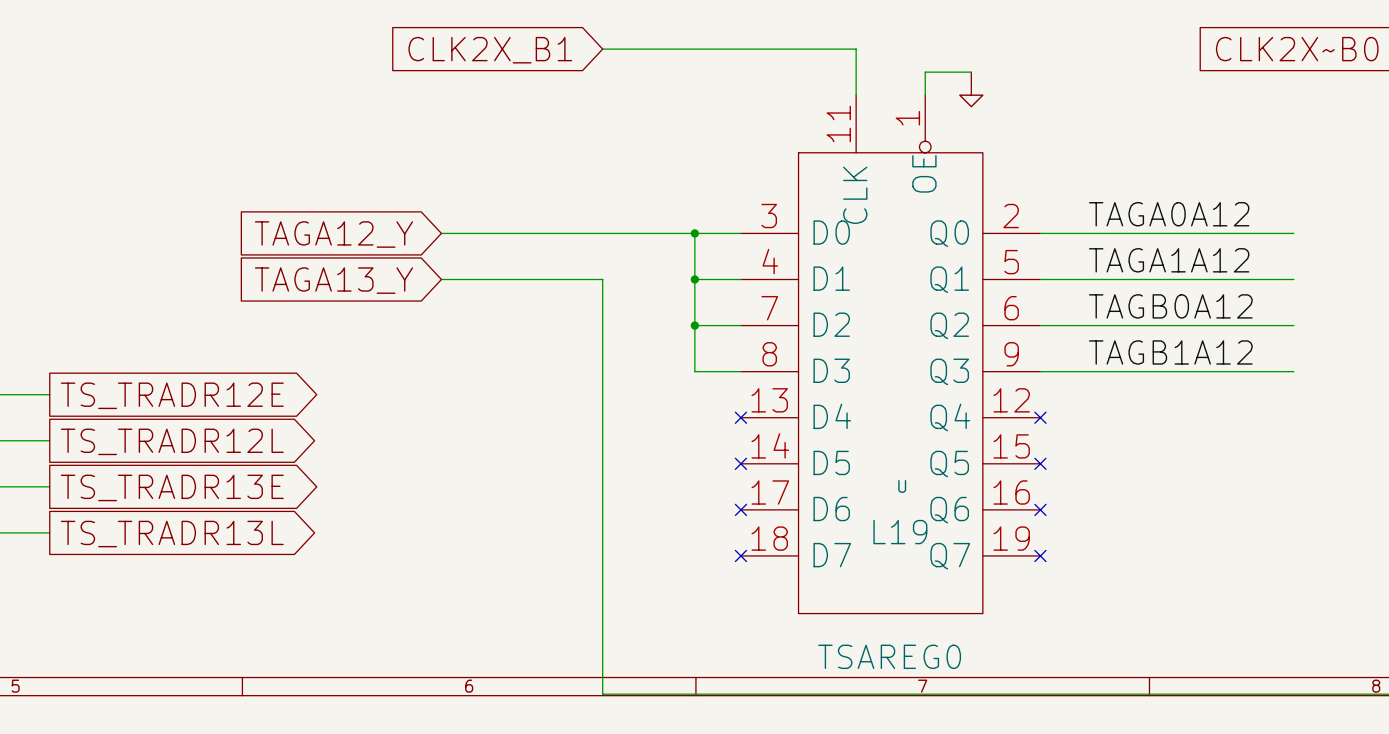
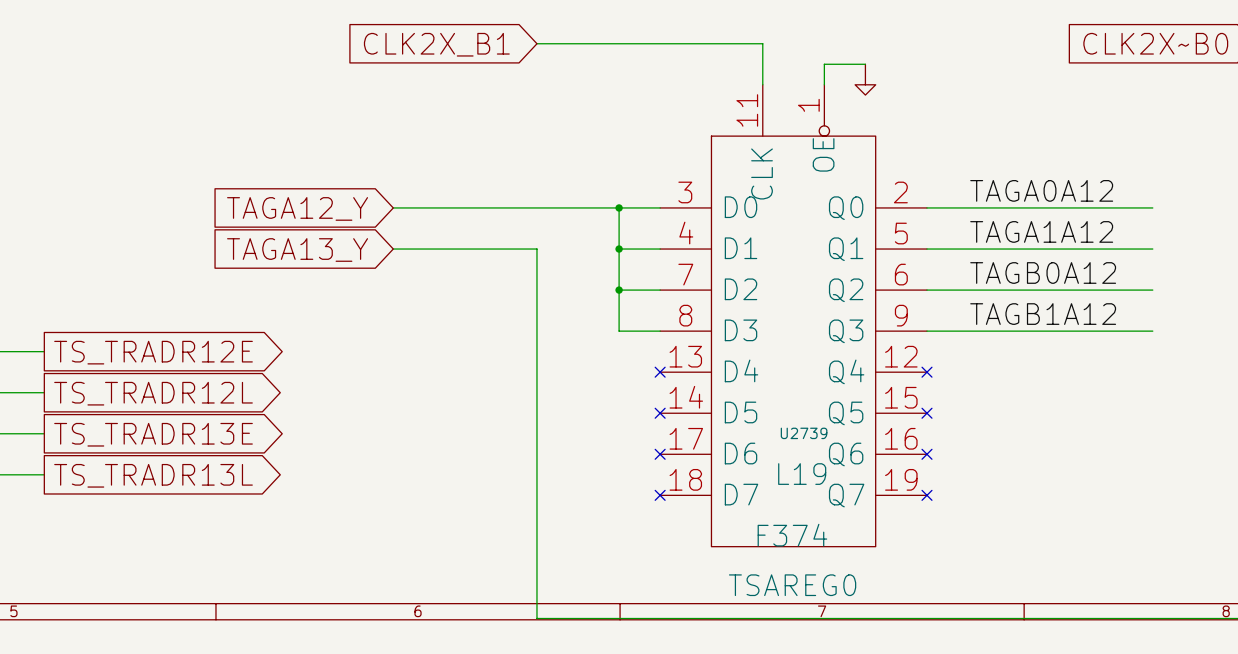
U name: U (902, 486) -> U2739 (804, 433)
U value: none -> F374 (792, 535)

